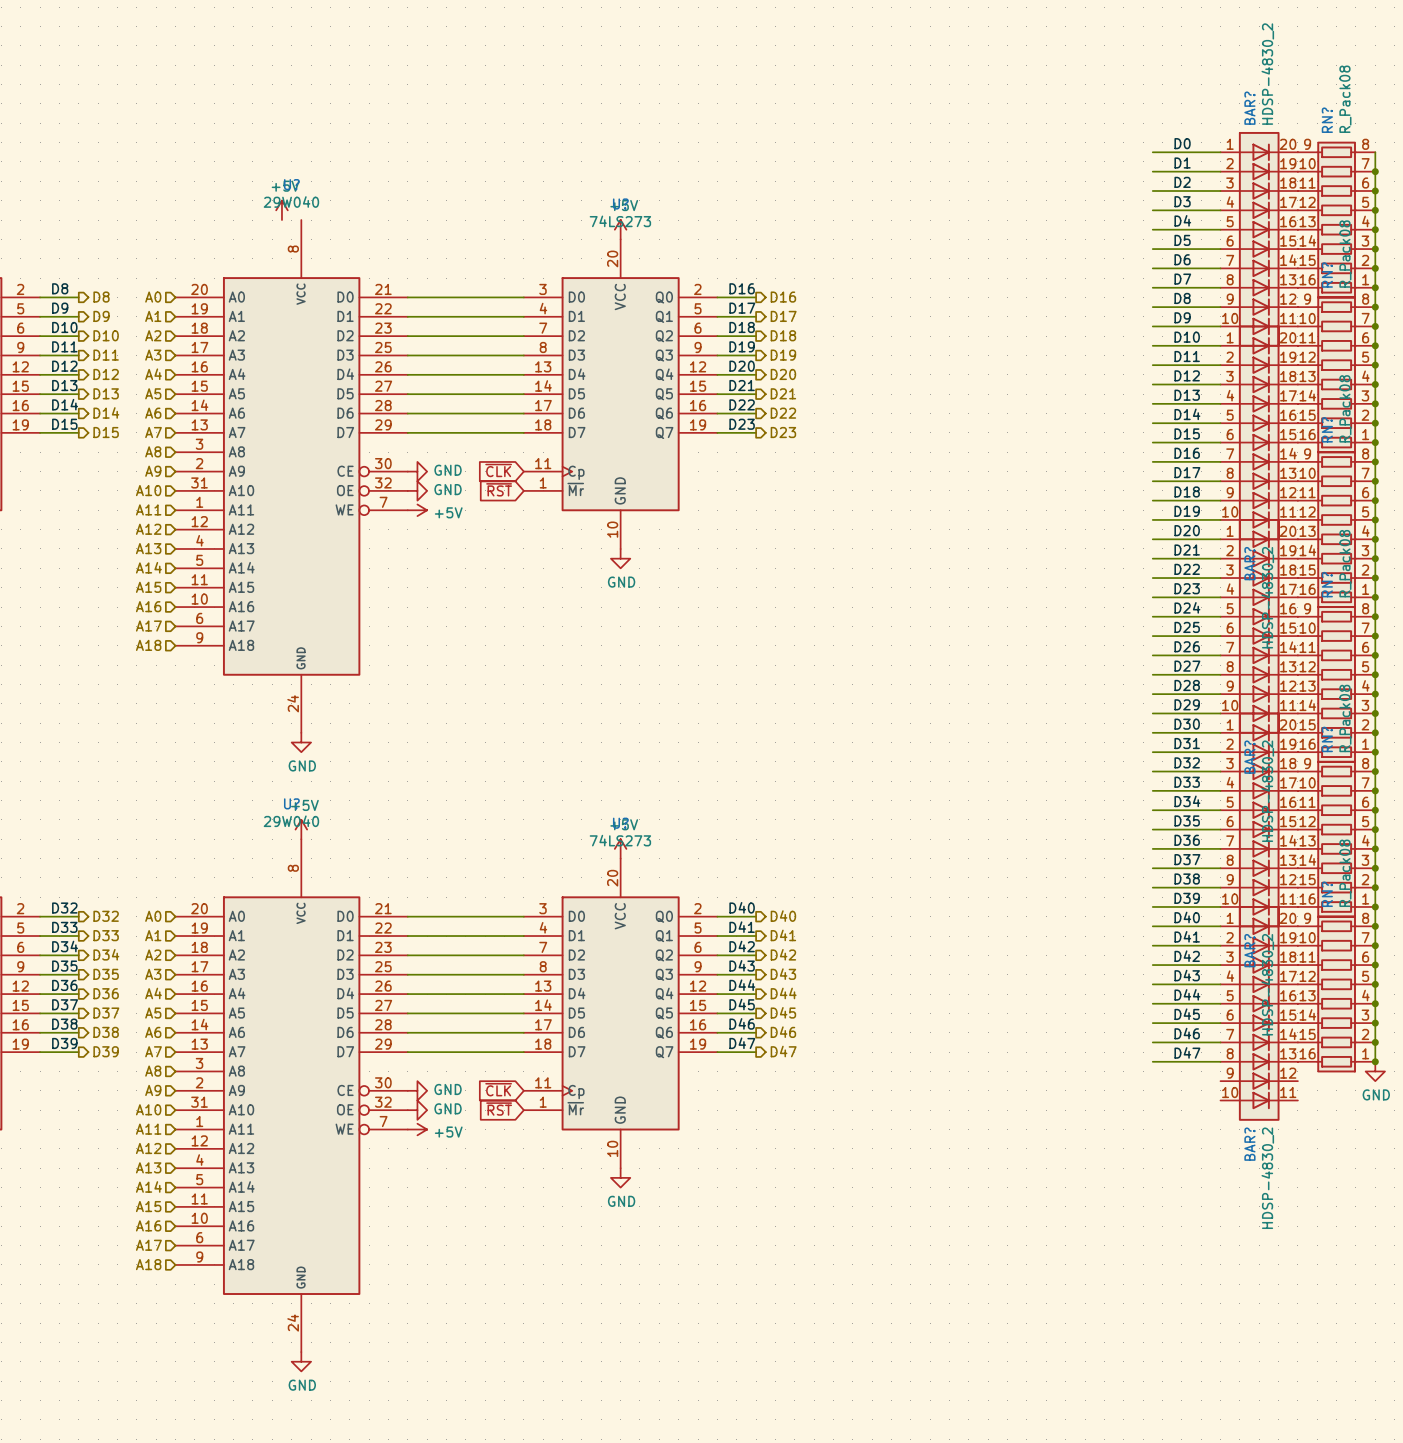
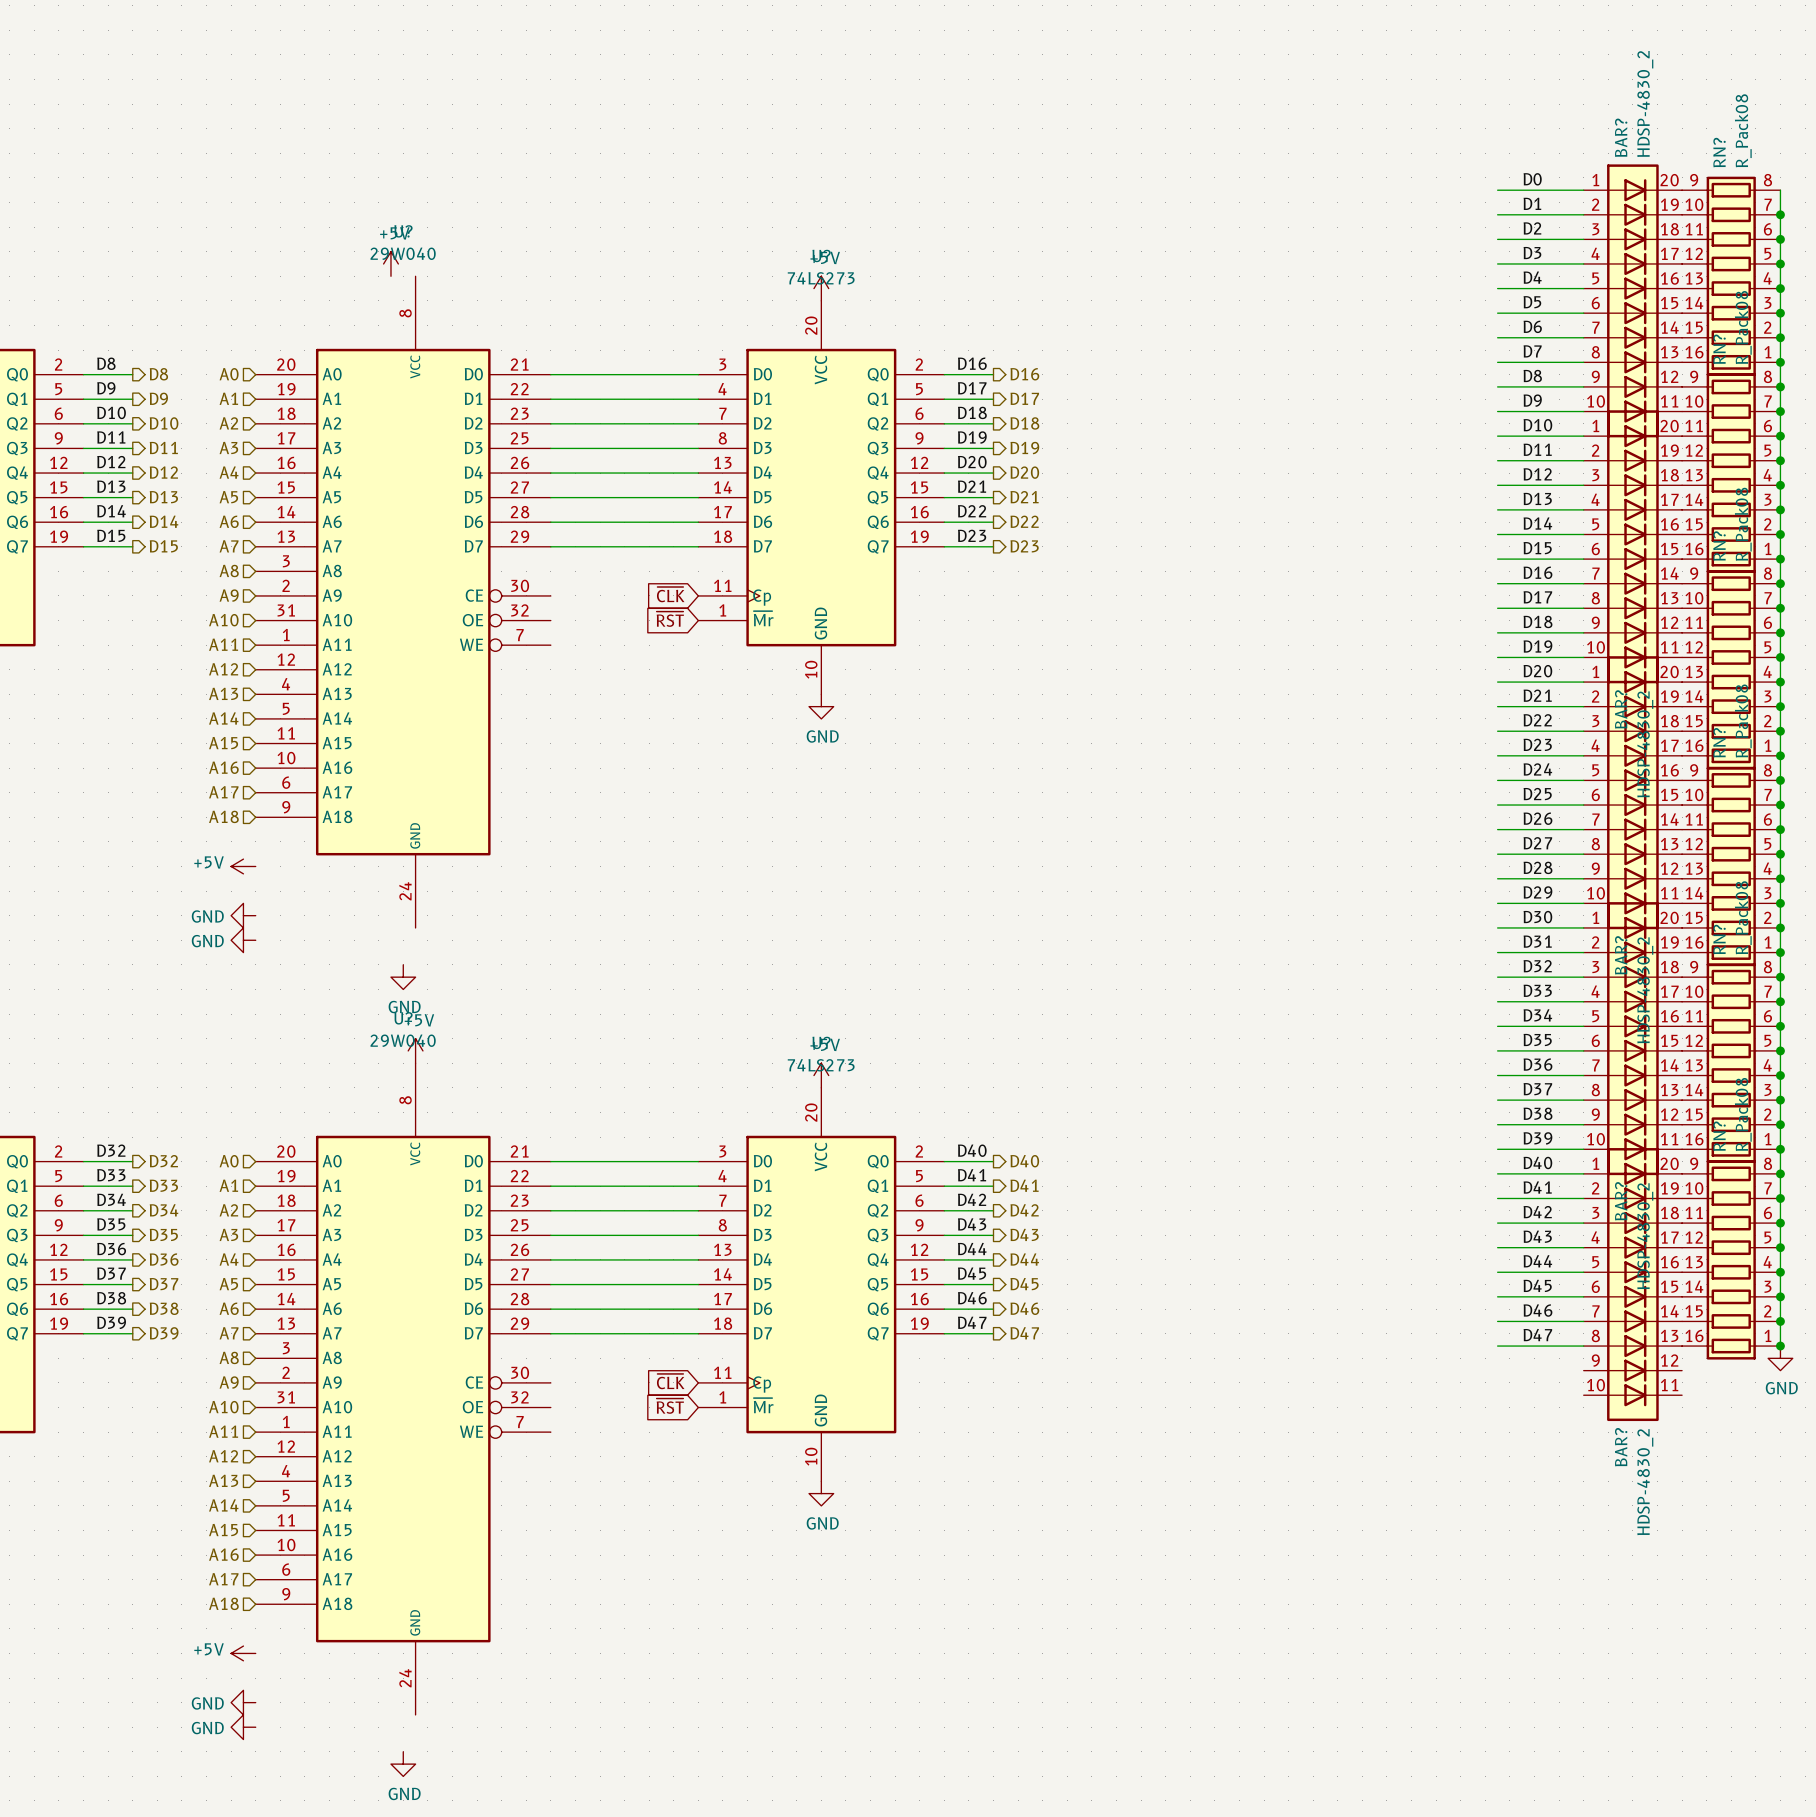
power symbol: GND (417, 471) -> none
power symbol: GND (417, 490) -> none
power symbol: +5V (417, 510) -> none
power symbol: none -> +5V (243, 866)
power symbol: none -> GND (243, 915)
power symbol: none -> GND (243, 940)
power symbol position: GND (301, 742) -> GND (403, 977)
power symbol: GND (417, 1090) -> none
power symbol: GND (417, 1110) -> none
power symbol: +5V (417, 1129) -> none
power symbol: none -> +5V (243, 1653)
power symbol: none -> GND (243, 1702)
power symbol: none -> GND (243, 1727)
power symbol position: GND (301, 1361) -> GND (403, 1764)

